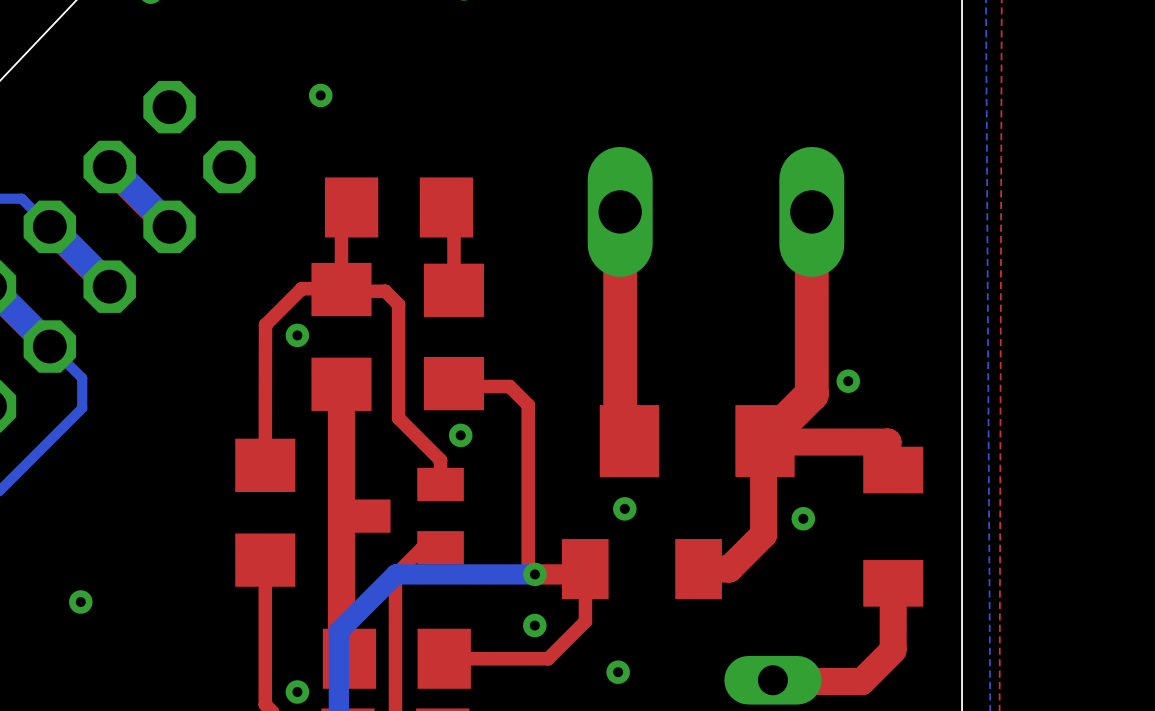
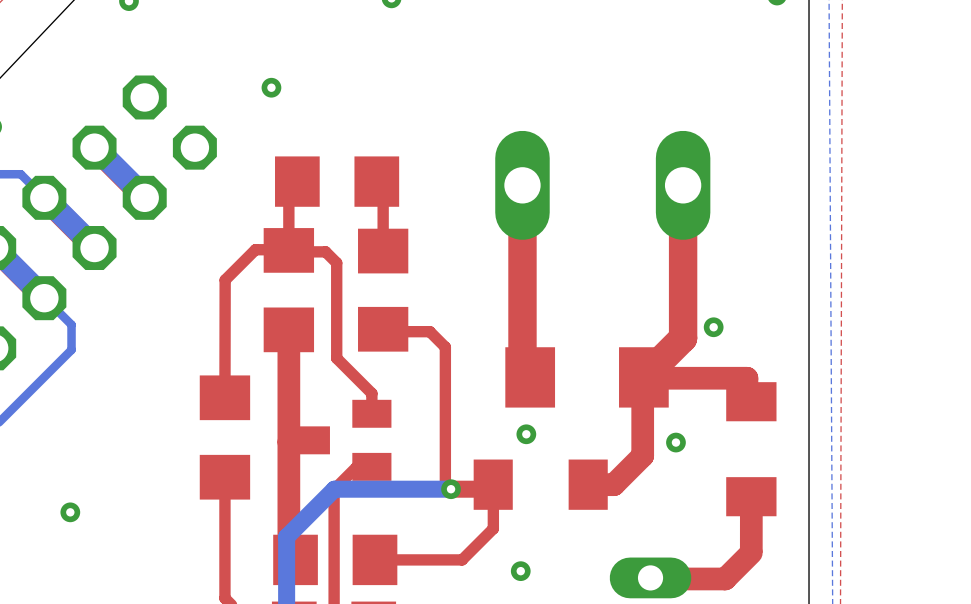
via: (297, 335) -> none
via: (460, 435) -> none
via: (534, 625) -> none
via: (297, 691) -> none

